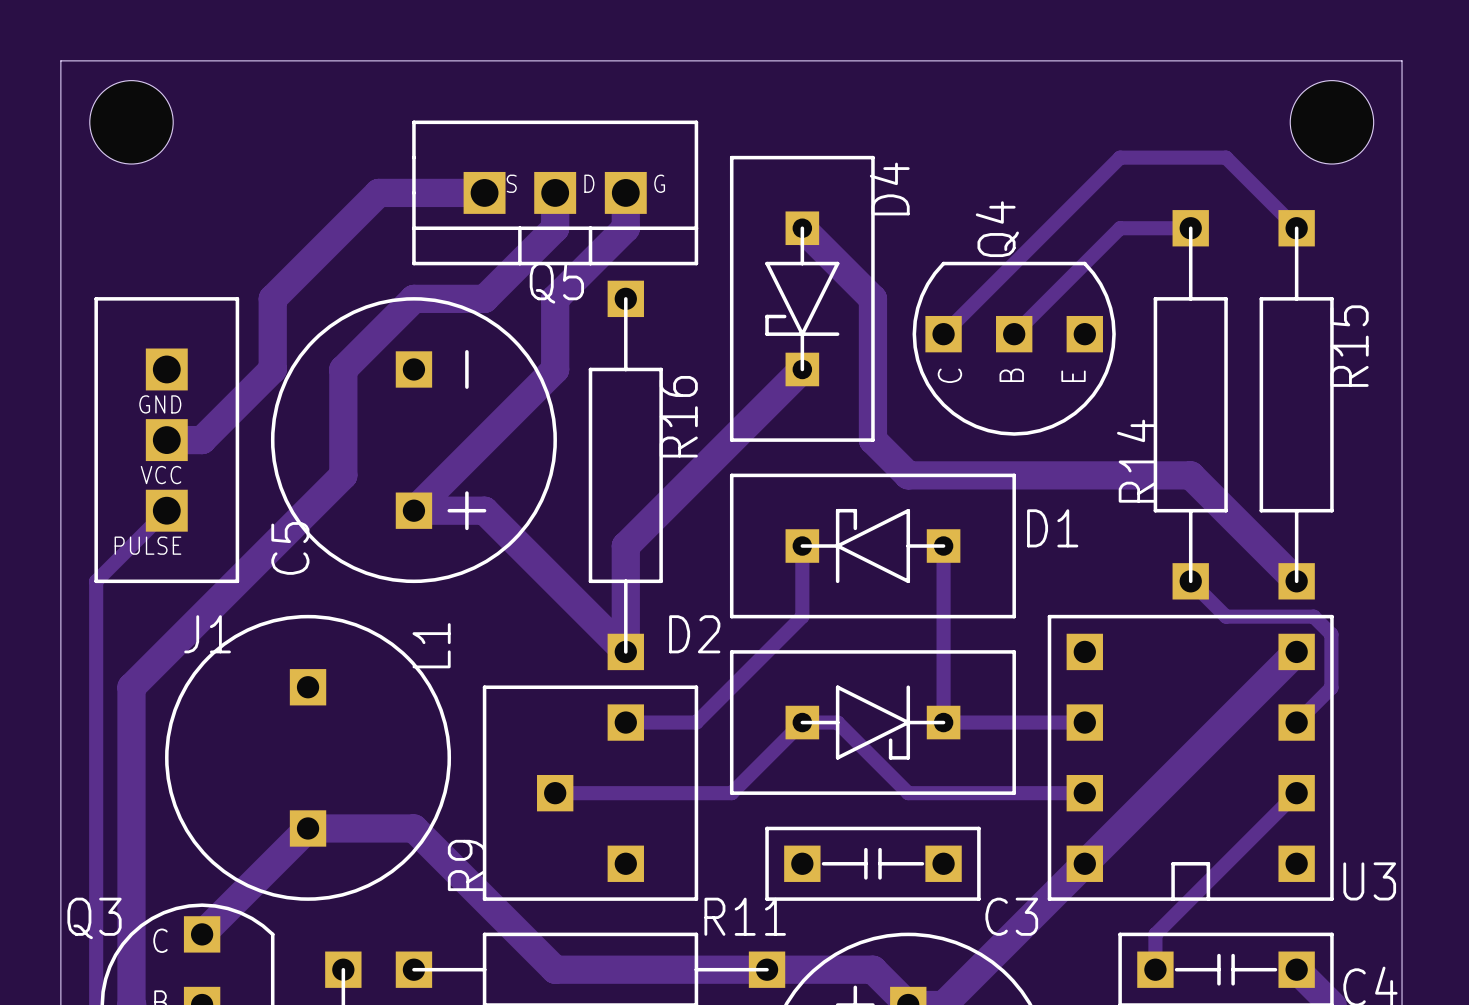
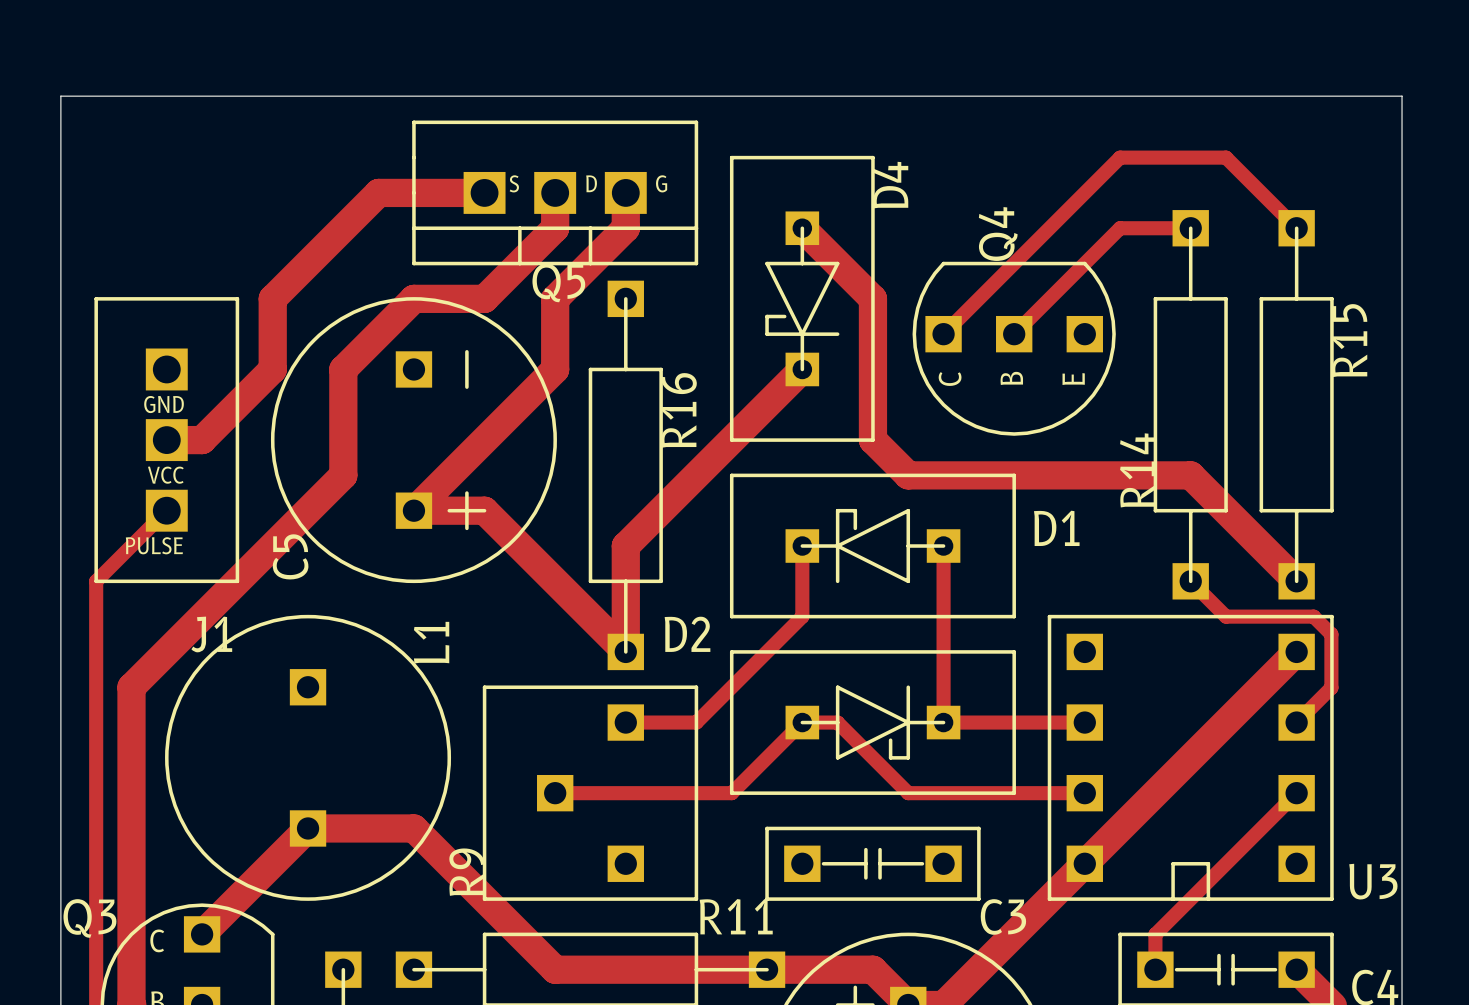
board edge: (60, 96) (60, 60) (1402, 60) (1402, 96) -> (60, 96) (1402, 96)
hole: (131, 122) -> none
hole: (1331, 122) -> none

